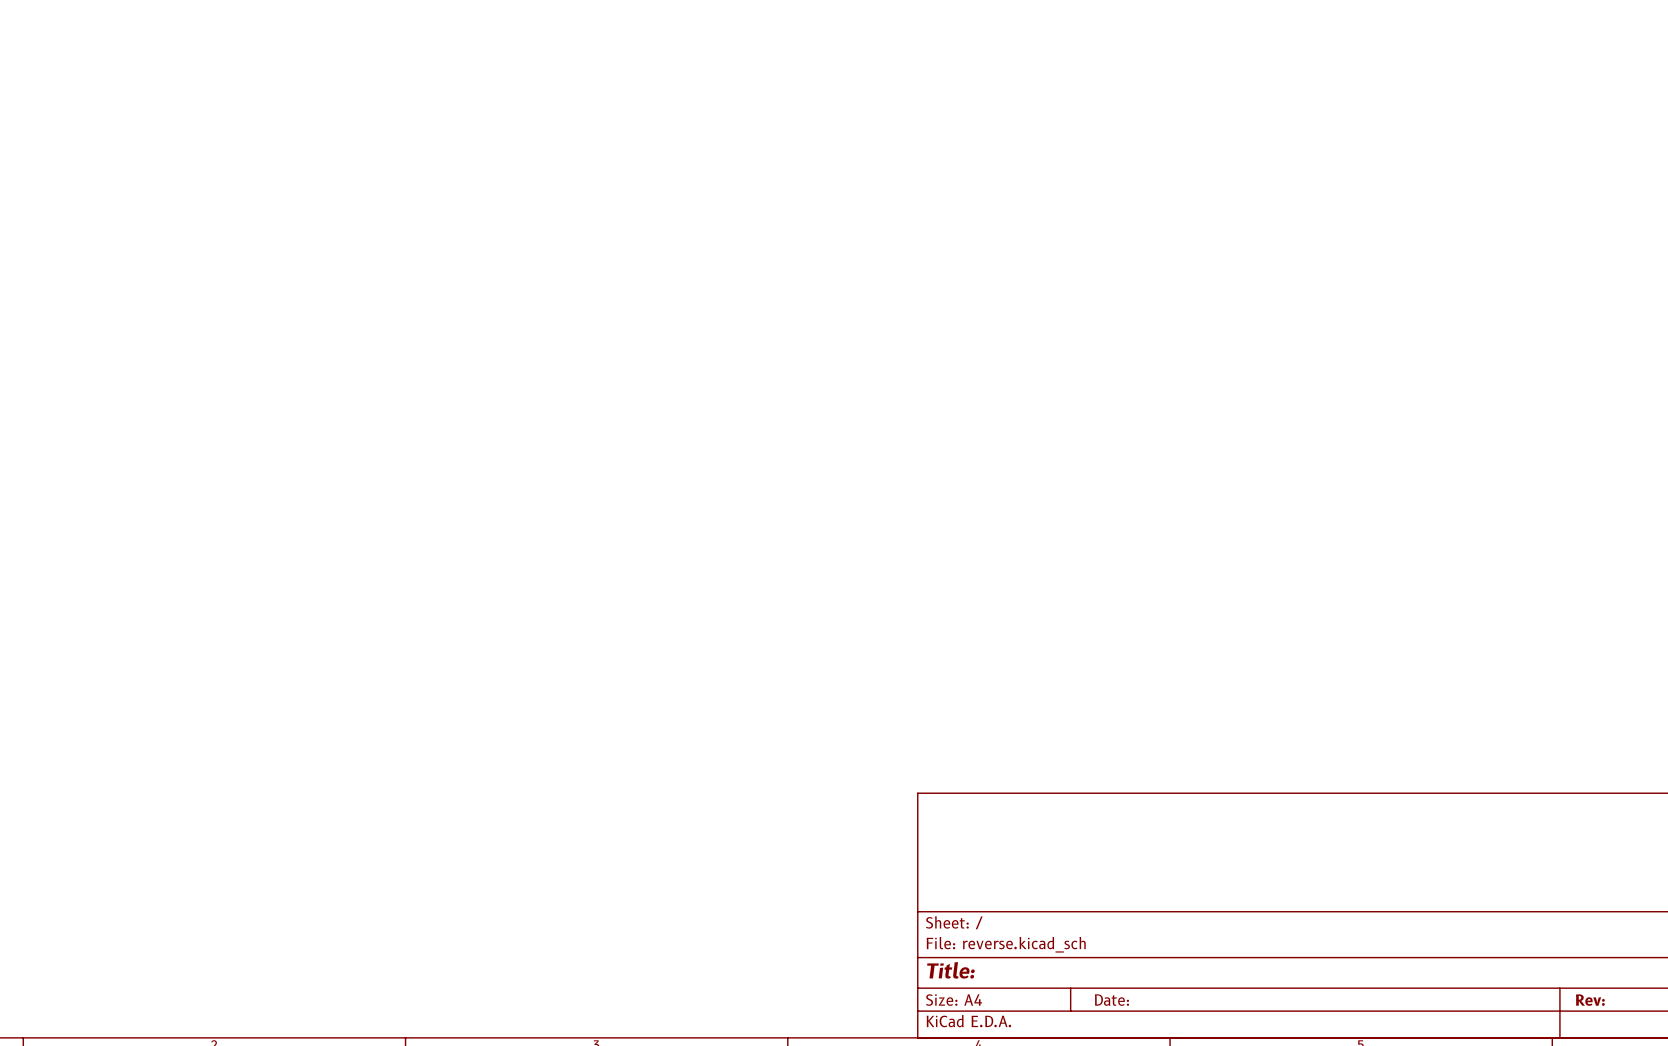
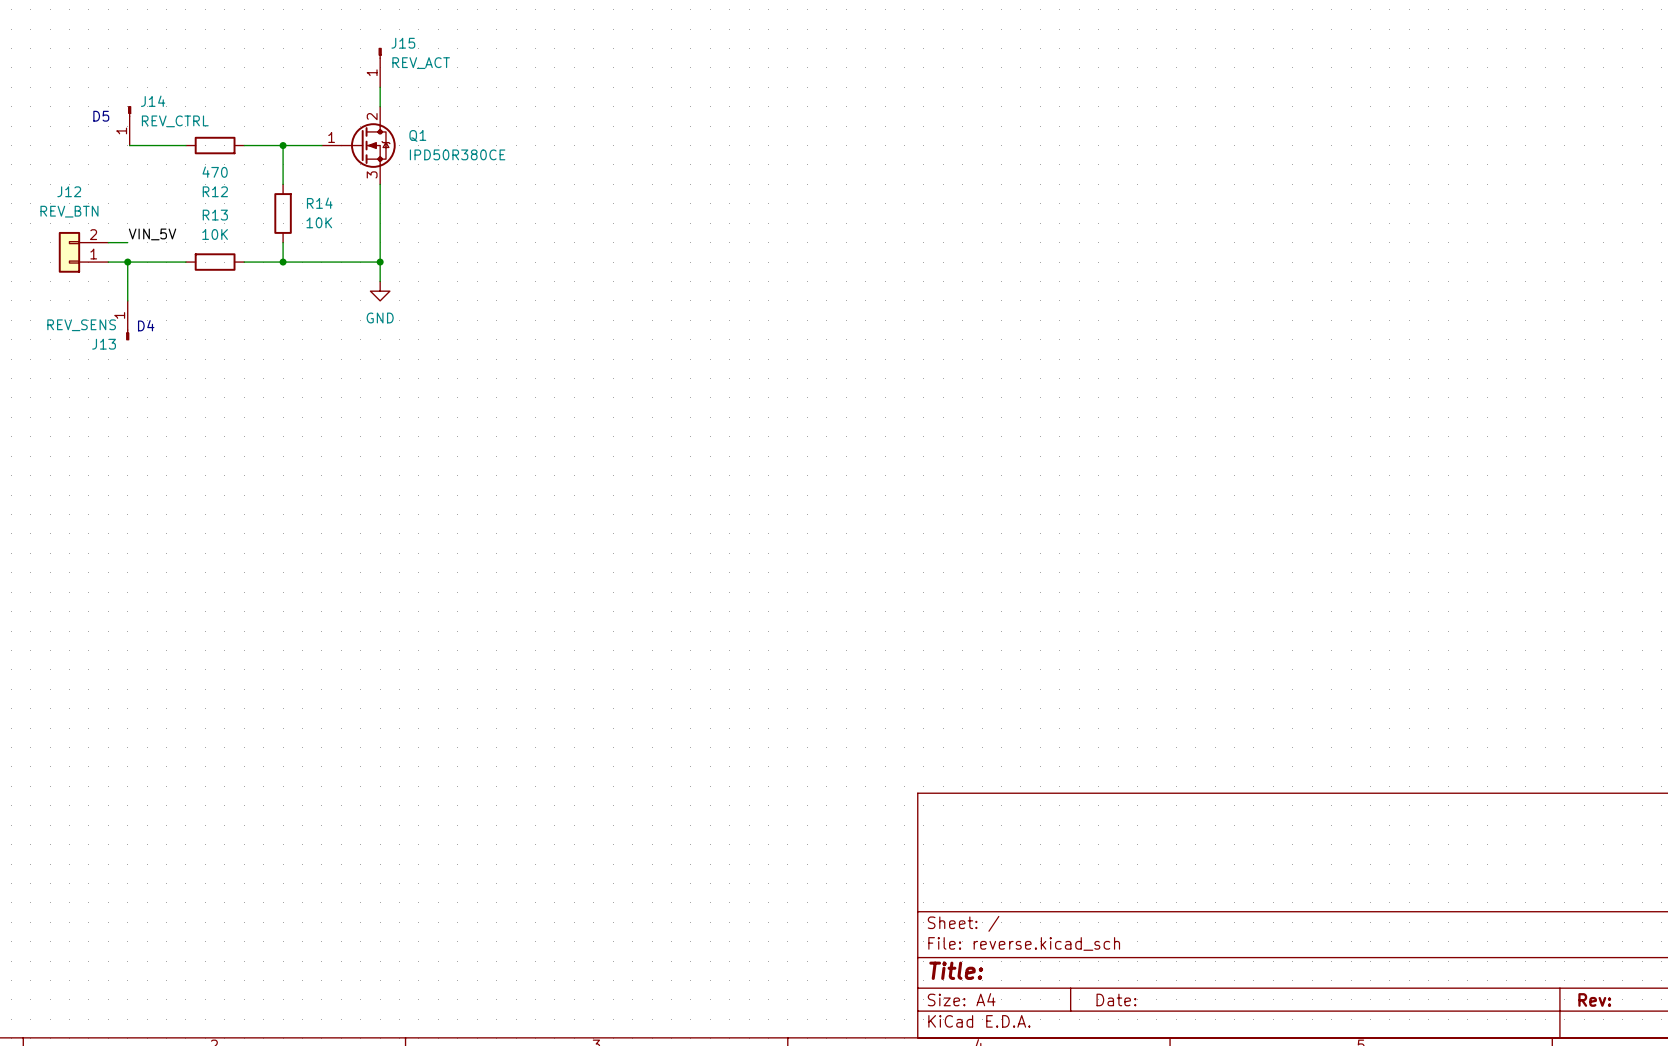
J15: none -> REV_ACT (380, 67)
wire: none -> (380, 87) (380, 106)
text: none -> D5 (101, 116)
J14: none -> REV_CTRL (129, 125)
wire: none -> (129, 145) (185, 145)
R12: none -> 470 (215, 145)
wire: none -> (244, 145) (321, 145)
wire: none -> (283, 145) (283, 184)
junction: none -> (283, 145)
Q1: none -> IPD50R380CE (358, 145)
wire: none -> (380, 184) (380, 281)
R14: none -> 10K (283, 213)
label: none -> VIN_5V (152, 234)
wire: none -> (108, 242) (127, 242)
wire: none -> (283, 242) (283, 262)
J12: none -> REV_BTN (83, 252)
wire: none -> (108, 262) (185, 262)
wire: none -> (127, 262) (127, 300)
junction: none -> (127, 262)
R13: none -> 10K (215, 262)
wire: none -> (244, 262) (380, 262)
junction: none -> (283, 262)
junction: none -> (380, 262)
power symbol: none -> GND (380, 291)
J13: none -> REV_SENS (127, 320)
text: none -> D4 (146, 325)

